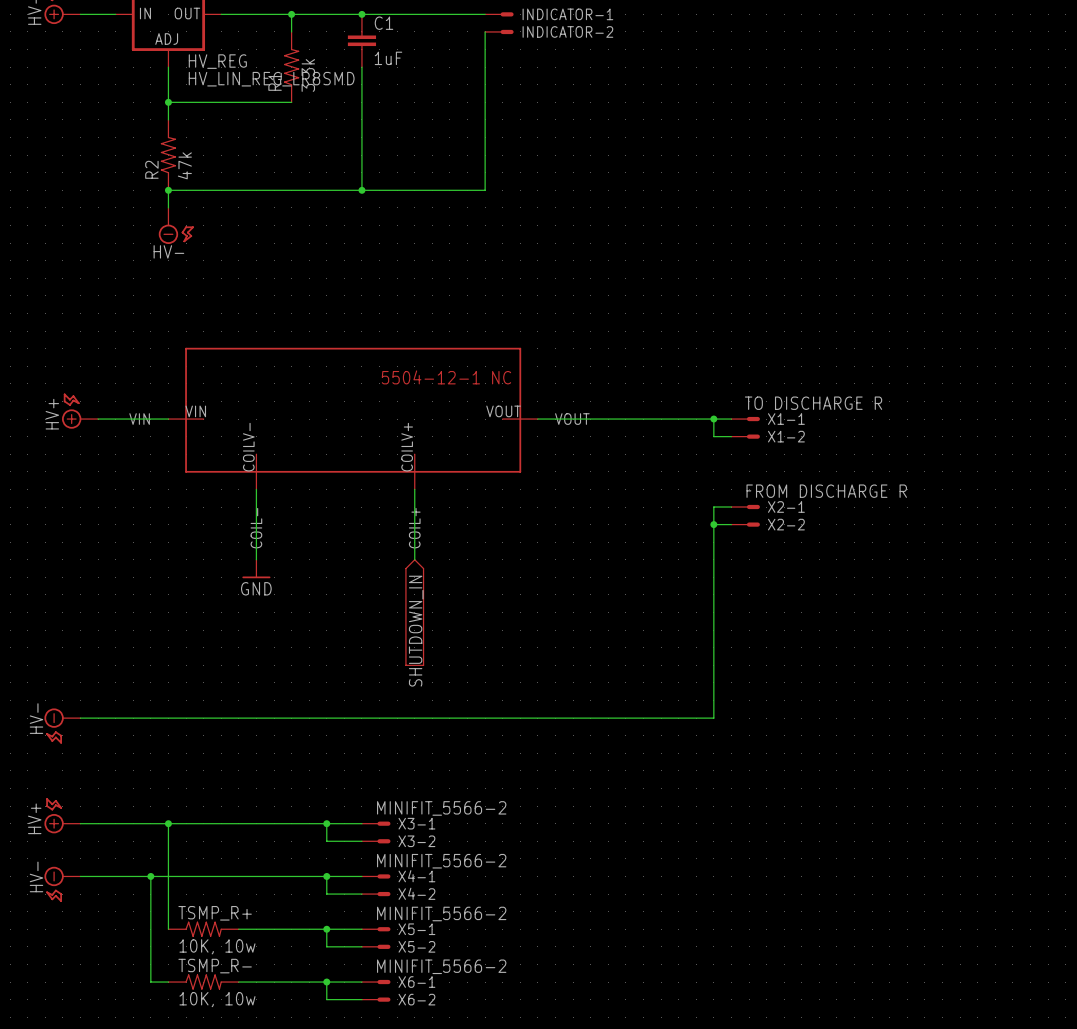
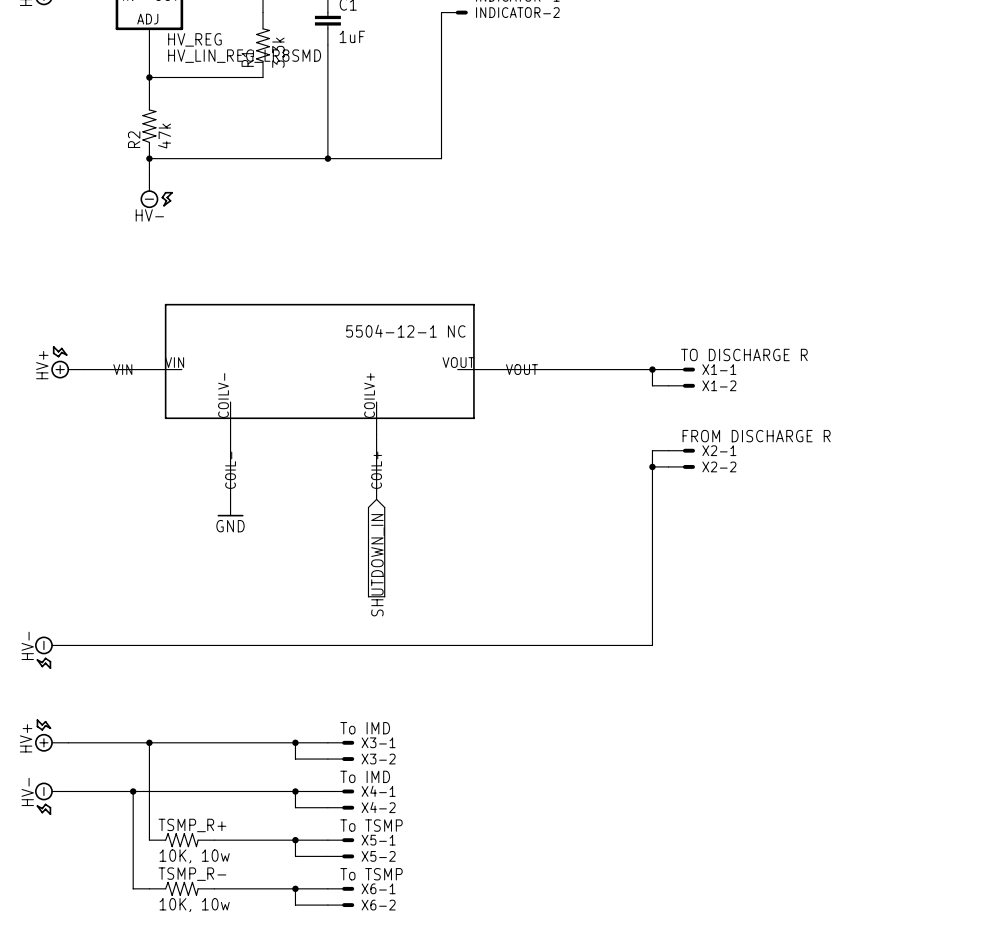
X3-1 value: MINIFIT_5566-2 (441, 808) -> To IMD (365, 728)
X4-1 value: MINIFIT_5566-2 (441, 861) -> To IMD (365, 776)
X5-1 value: MINIFIT_5566-2 (441, 913) -> To TSMP (371, 825)
X6-1 value: MINIFIT_5566-2 (441, 966) -> To TSMP (371, 874)

